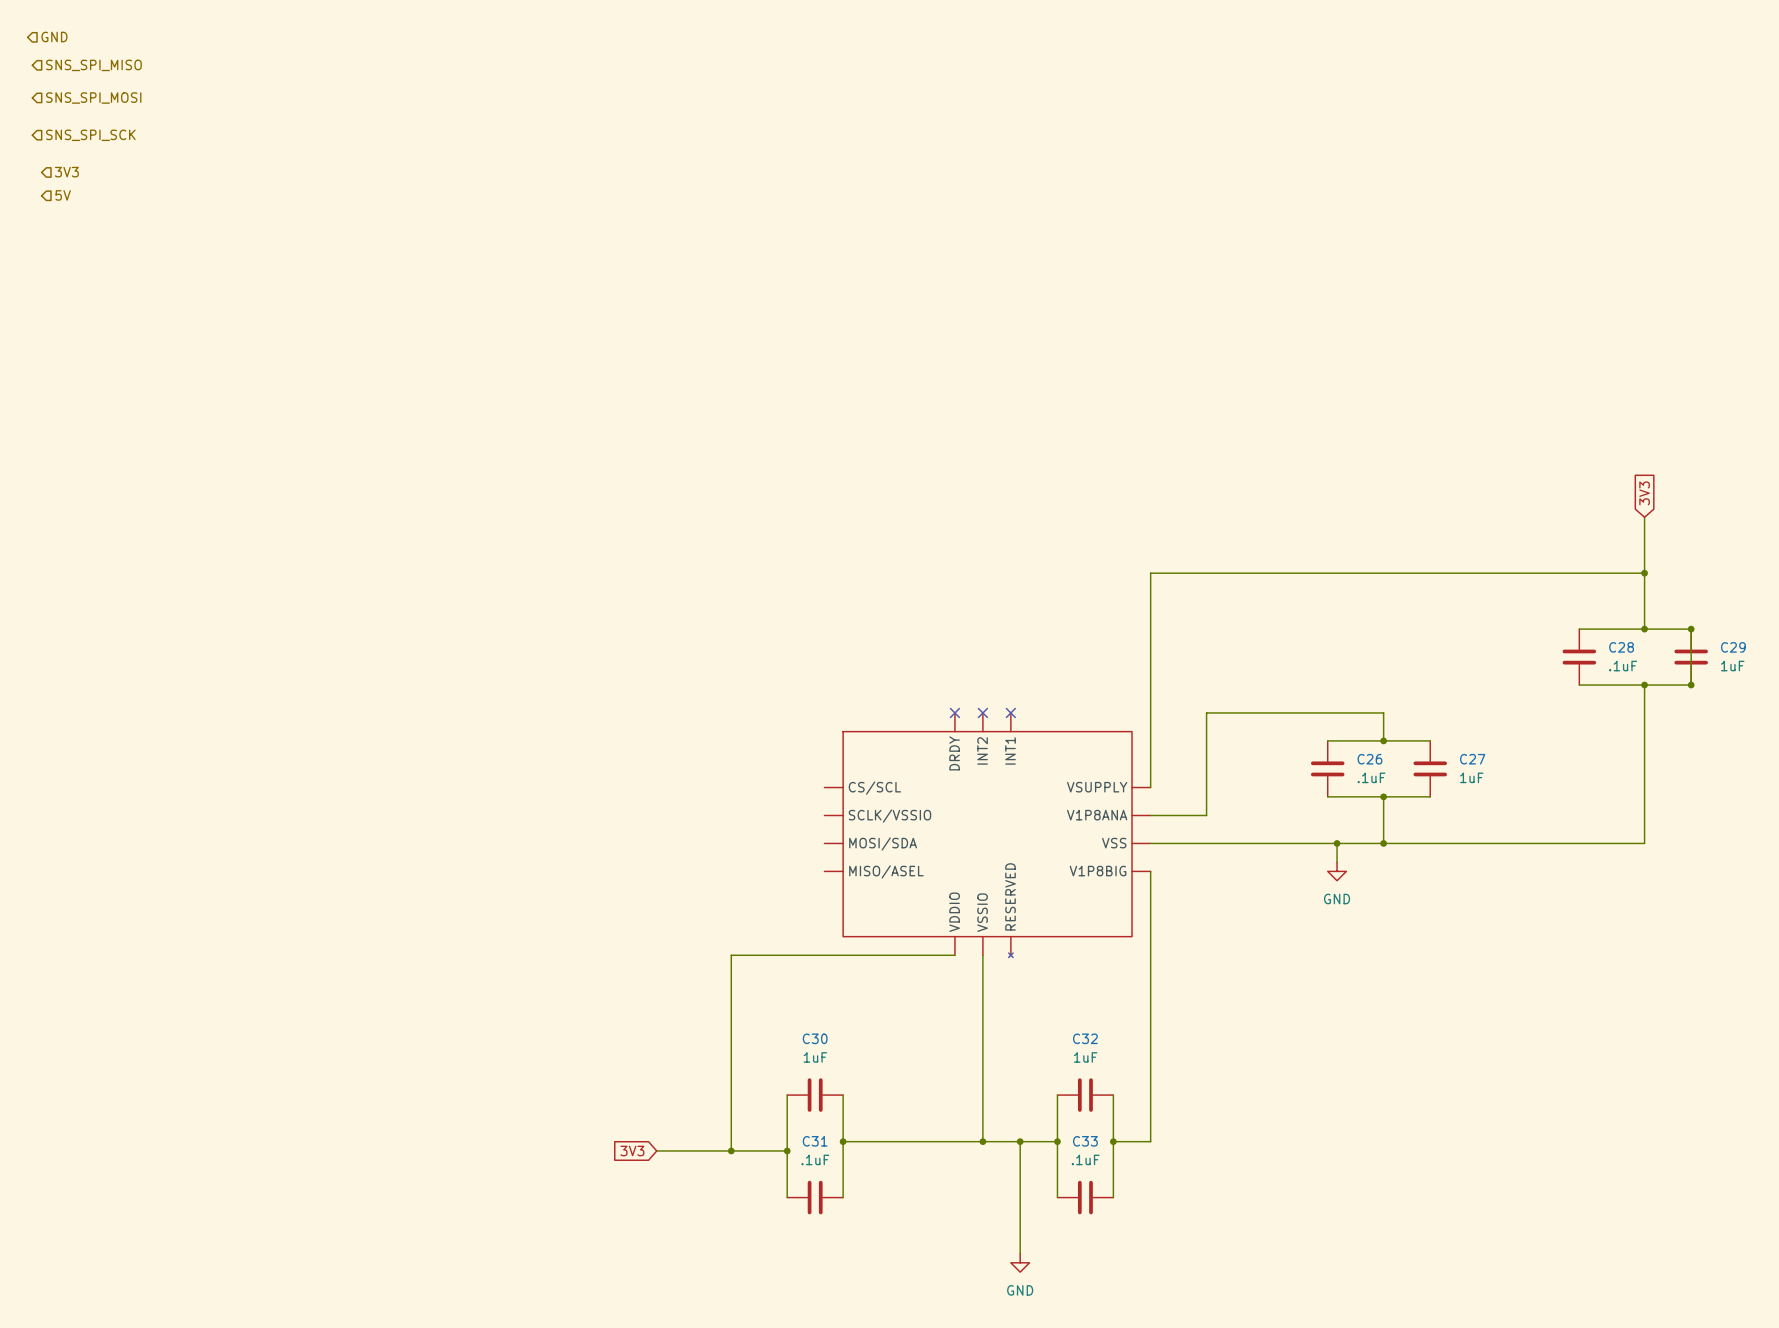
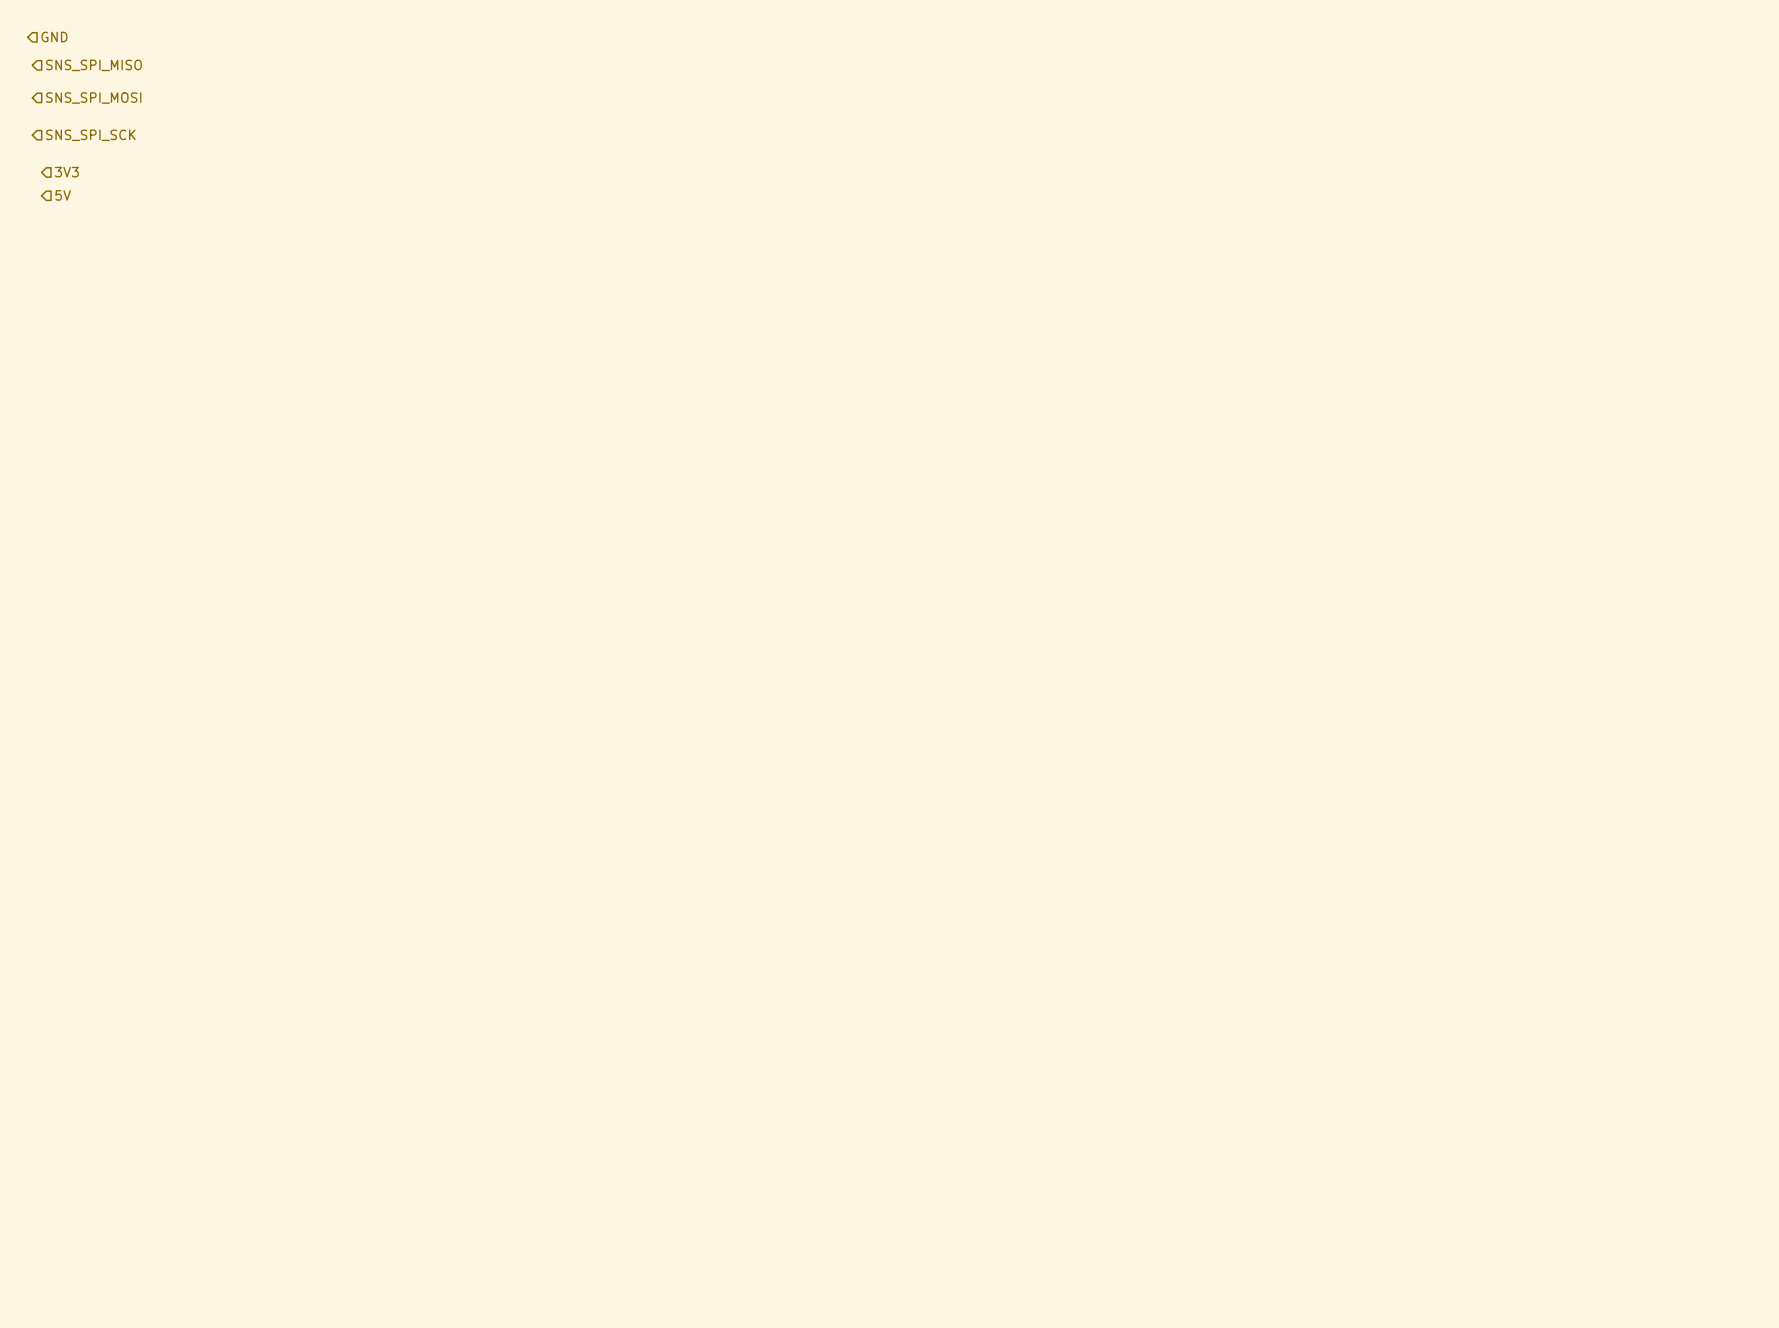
global label: 3V3 (1644, 493) -> none
wire: (1644, 517) (1644, 629) -> none
wire: (1644, 573) (1150, 573) (1150, 787) -> none
junction: (1644, 573) -> none
wire: (1579, 629) (1691, 629) (1691, 685) (1579, 685) -> none
junction: (1644, 629) -> none
junction: (1691, 629) -> none
C28: .1uF (1579, 657) -> none
C29: 1uF (1691, 657) -> none
wire: (1644, 685) (1644, 843) (1150, 843) -> none
junction: (1644, 685) -> none
junction: (1691, 685) -> none
no-connect mark: (954, 712) -> none
no-connect mark: (982, 712) -> none
no-connect mark: (1010, 712) -> none
wire: (1327, 740) (1430, 740) -> none
wire: (1383, 740) (1383, 712) (1206, 712) (1206, 815) (1150, 815) -> none
junction: (1383, 740) -> none
C26: .1uF (1327, 768) -> none
C27: 1uF (1430, 768) -> none
wire: (1327, 796) (1430, 796) -> none
wire: (1383, 796) (1383, 843) -> none
junction: (1383, 796) -> none
part: (987, 835) -> none
wire: (1337, 843) (1337, 862) -> none
junction: (1337, 843) -> none
junction: (1383, 843) -> none
wire: (1150, 871) (1150, 1141) (1113, 1141) -> none
power symbol: GND (1337, 871) -> none
wire: (954, 955) (731, 955) (731, 1150) -> none
wire: (982, 955) (982, 1141) -> none
wire: (787, 1095) (787, 1197) -> none
C30: 1uF (815, 1095) -> none
wire: (843, 1095) (843, 1197) -> none
wire: (1057, 1095) (1057, 1197) -> none
C32: 1uF (1085, 1095) -> none
wire: (1113, 1095) (1113, 1197) -> none
wire: (843, 1141) (1057, 1141) -> none
junction: (843, 1141) -> none
junction: (982, 1141) -> none
wire: (1020, 1141) (1020, 1253) -> none
junction: (1020, 1141) -> none
junction: (1057, 1141) -> none
junction: (1113, 1141) -> none
global label: 3V3 (632, 1150) -> none
wire: (656, 1150) (787, 1150) -> none
junction: (731, 1150) -> none
junction: (787, 1150) -> none
C31: .1uF (815, 1197) -> none
C33: .1uF (1085, 1197) -> none
power symbol: GND (1020, 1262) -> none

